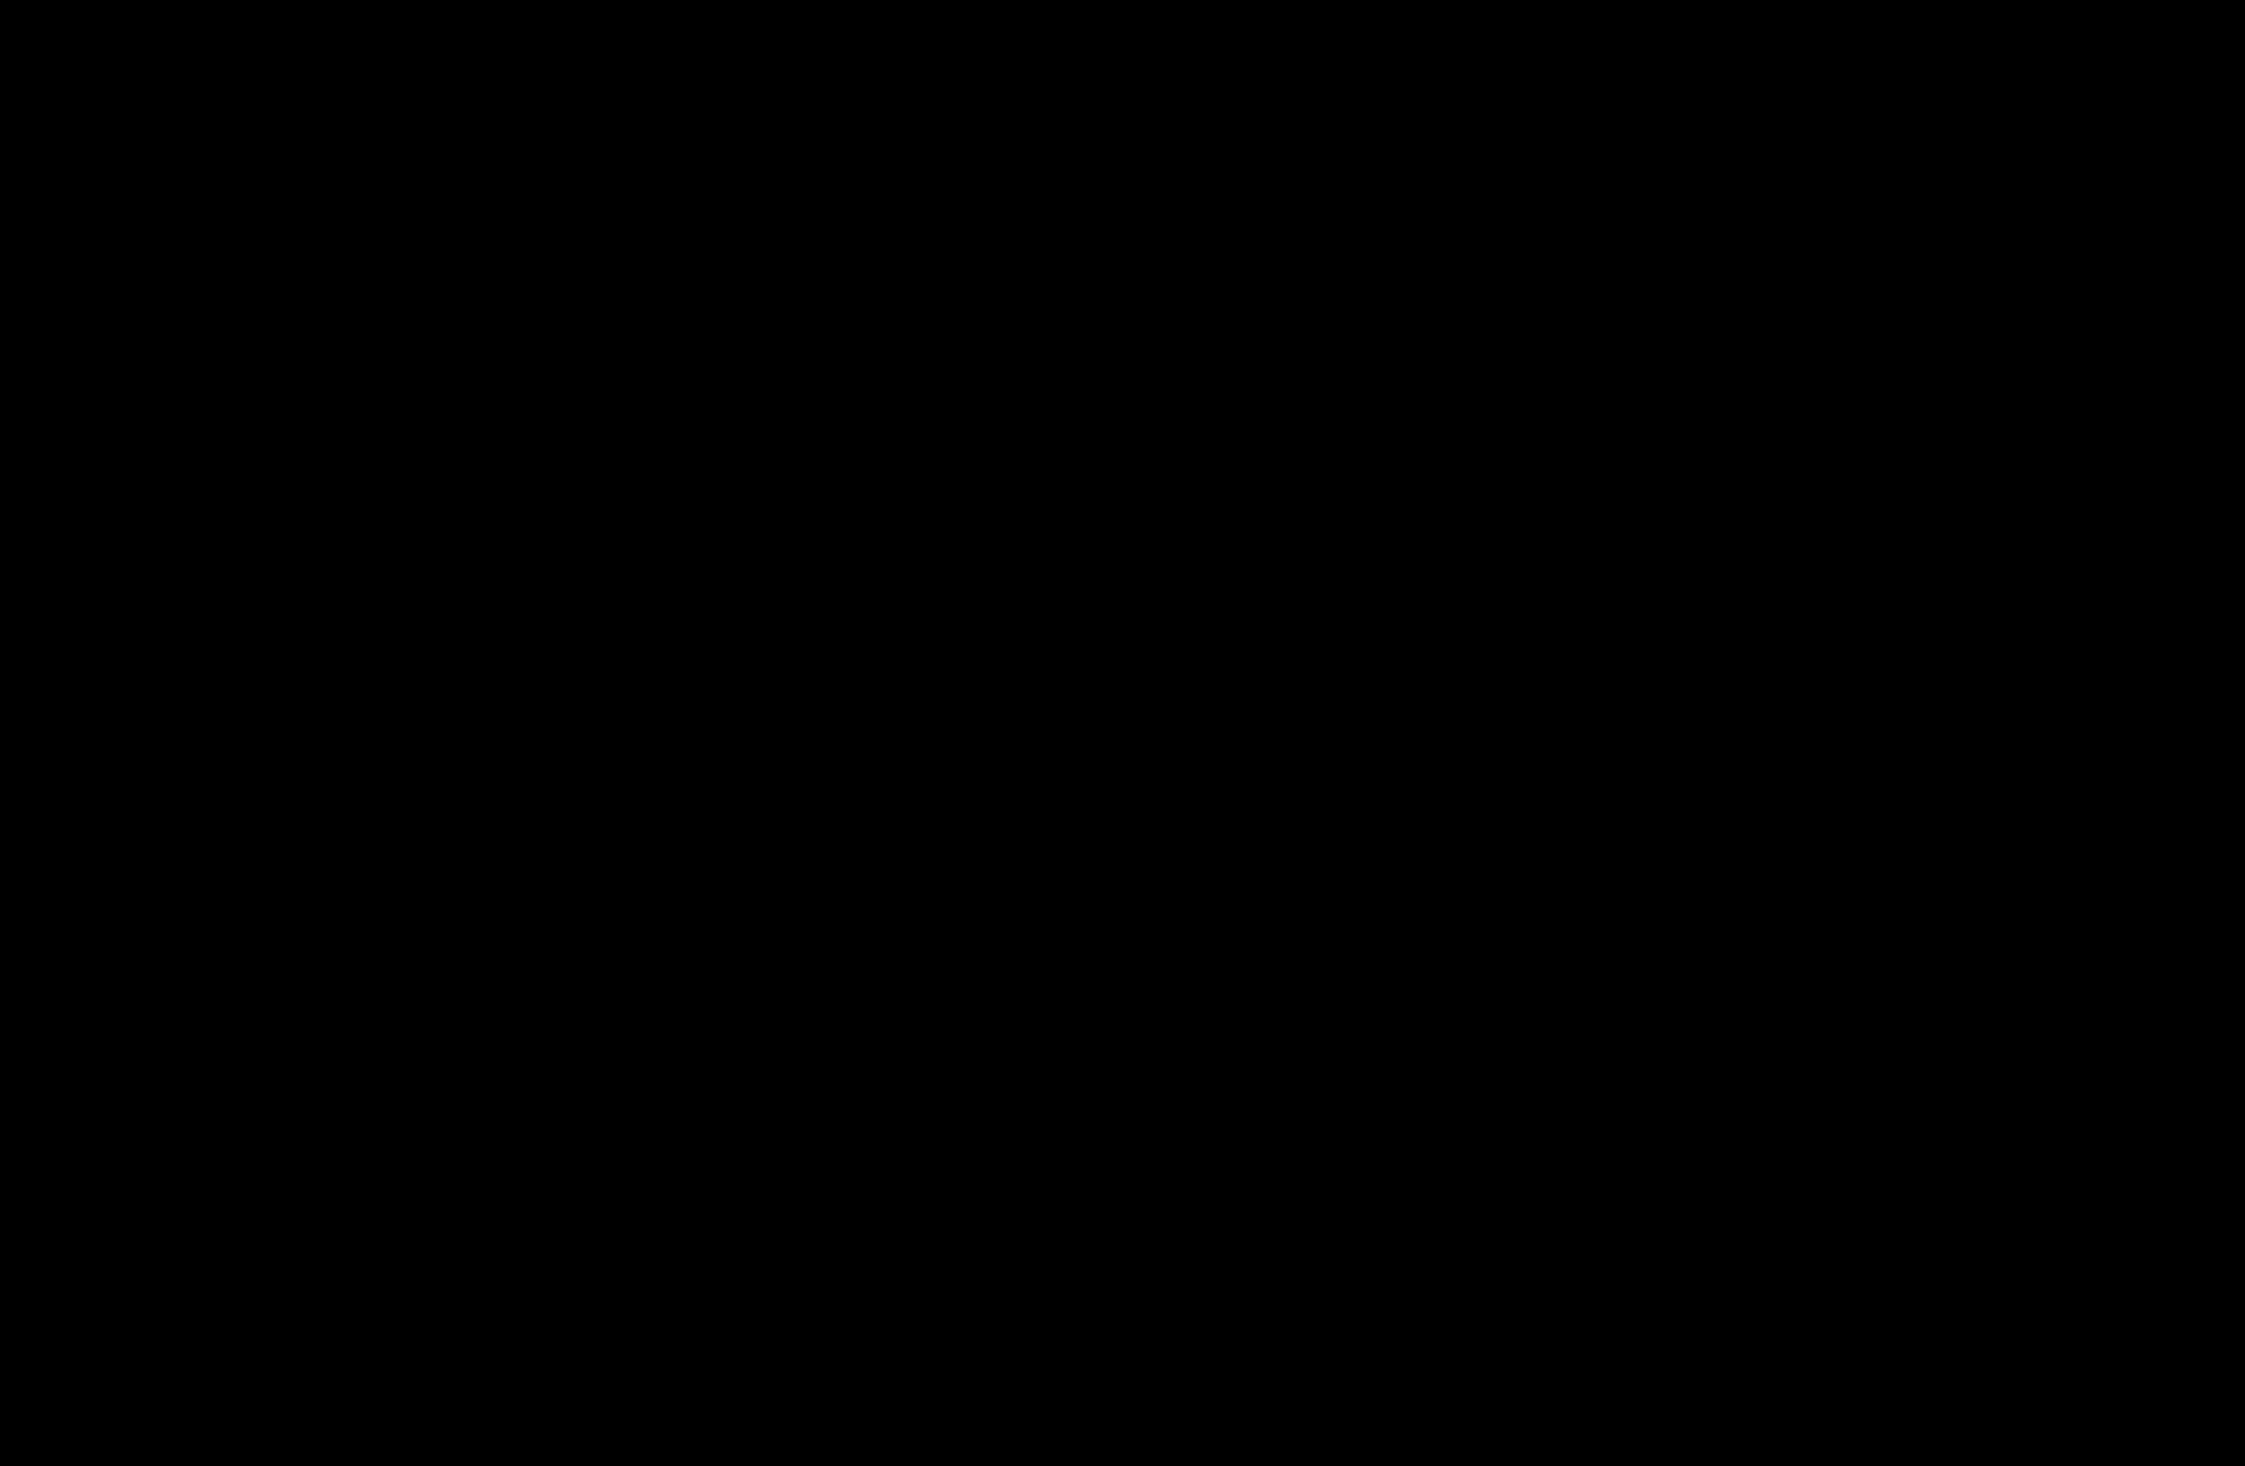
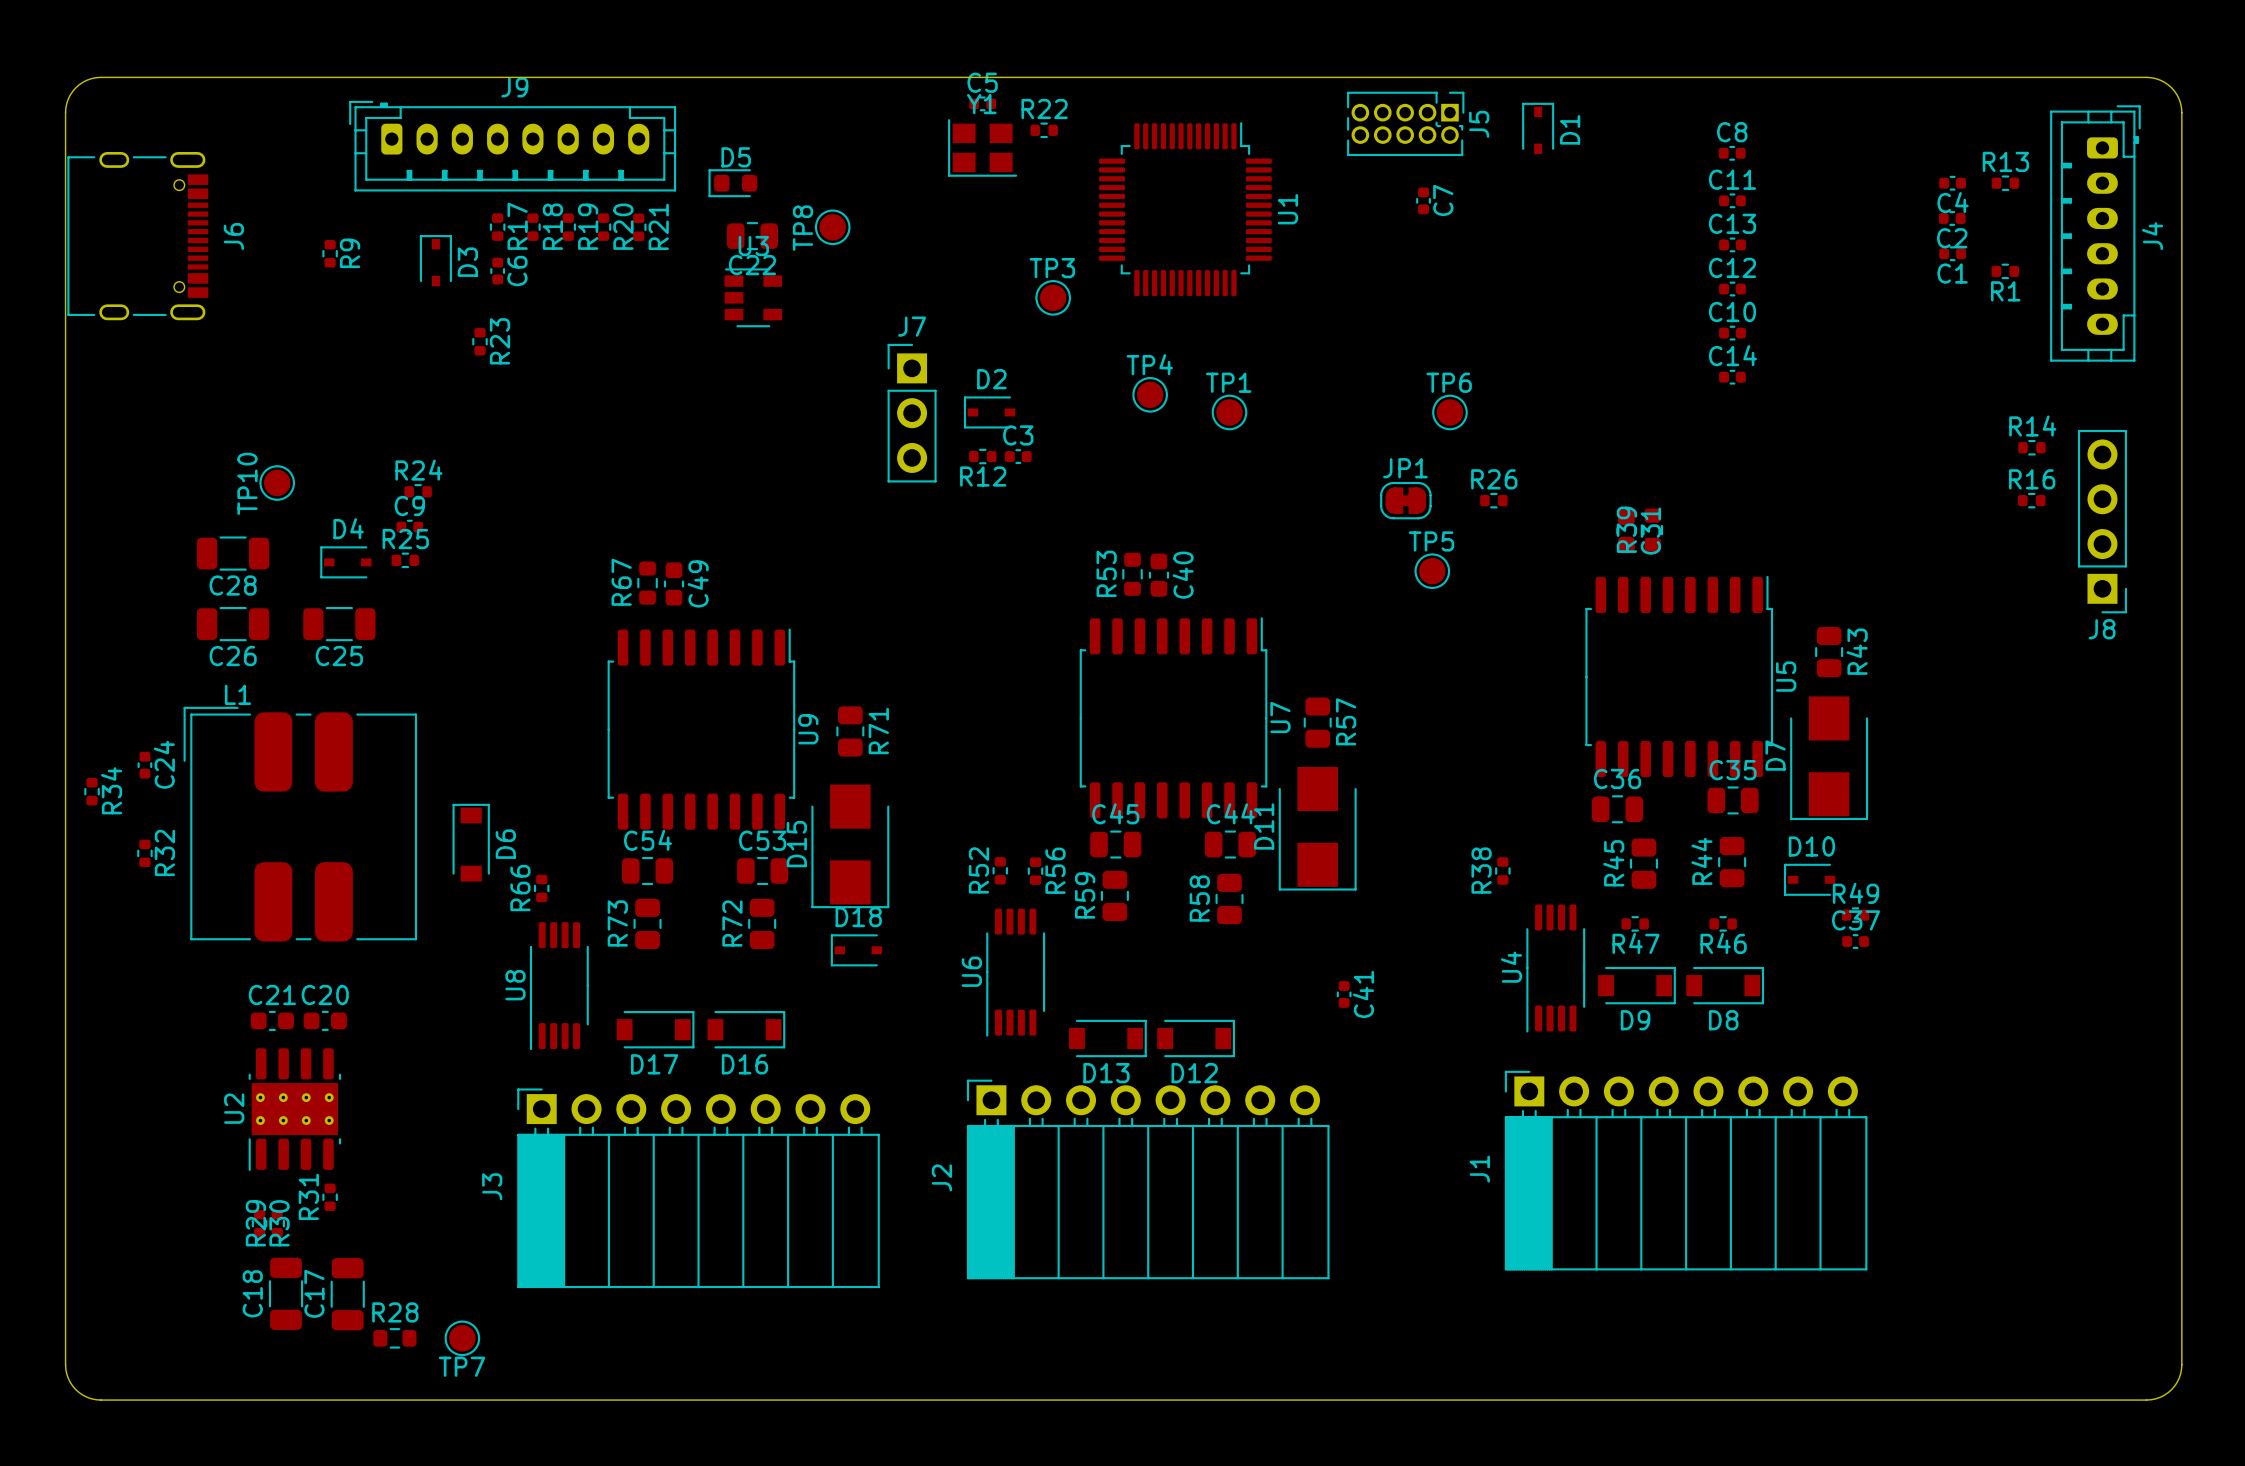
board edge: none -> (100, 77) (2146, 77) (2164, 82) (2177, 95) (2181, 112) (2181, 1364) (2177, 1382) (2164, 1395) (2146, 1400) (100, 1400) (83, 1395) (70, 1382) (65, 1364) (65, 112) (68, 99) (75, 87) (87, 80) (100, 77)
C5: none -> (982, 103)
J5: none -> (1405, 123)
D1: none -> (1538, 128)
R22: none -> (1044, 130)
J9: none -> (512, 146)
Y1: none -> (982, 147)
C8: none -> (1732, 153)
D5: none -> (732, 183)
C4: none -> (1952, 183)
R13: none -> (2005, 183)
C7: none -> (1423, 200)
C11: none -> (1732, 200)
U1: none -> (1185, 209)
C2: none -> (1952, 218)
R17: none -> (497, 227)
R18: none -> (532, 227)
R19: none -> (568, 227)
R20: none -> (603, 227)
R21: none -> (638, 227)
TP8: none -> (832, 227)
J4: none -> (2095, 233)
J6: none -> (137, 236)
C22: none -> (752, 236)
C13: none -> (1732, 244)
R9: none -> (330, 253)
C1: none -> (1952, 253)
D3: none -> (435, 260)
C6: none -> (497, 271)
R1: none -> (2005, 271)
C12: none -> (1732, 289)
U3: none -> (753, 297)
TP3: none -> (1053, 297)
C10: none -> (1732, 333)
R23: none -> (480, 341)
C14: none -> (1732, 377)
TP4: none -> (1150, 394)
D2: none -> (989, 412)
TP1: none -> (1229, 412)
TP6: none -> (1449, 412)
J7: none -> (912, 413)
R14: none -> (2031, 447)
R12: none -> (982, 456)
C3: none -> (1018, 456)
TP10: none -> (277, 483)
R24: none -> (418, 491)
JP1: none -> (1405, 500)
R26: none -> (1493, 500)
R16: none -> (2031, 500)
J8: none -> (2102, 521)
C9: none -> (409, 527)
R39: none -> (1652, 530)
C31: none -> (1626, 531)
C28: none -> (233, 553)
R25: none -> (405, 560)
D4: none -> (345, 562)
TP5: none -> (1432, 571)
R53: none -> (1132, 574)
C40: none -> (1158, 575)
R67: none -> (647, 583)
C49: none -> (674, 583)
C26: none -> (233, 624)
C25: none -> (339, 624)
R43: none -> (1829, 652)
U5: none -> (1679, 676)
U7: none -> (1173, 717)
R57: none -> (1317, 722)
U9: none -> (701, 729)
R71: none -> (850, 731)
D7: none -> (1829, 758)
C24: none -> (144, 765)
R34: none -> (92, 791)
C35: none -> (1733, 800)
C36: none -> (1617, 809)
L1: none -> (300, 824)
D11: none -> (1317, 828)
D6: none -> (471, 842)
C45: none -> (1115, 844)
C44: none -> (1230, 844)
D15: none -> (850, 846)
R32: none -> (144, 853)
R44: none -> (1732, 862)
R45: none -> (1643, 863)
C54: none -> (647, 870)
C53: none -> (762, 870)
R52: none -> (1000, 870)
R38: none -> (1502, 870)
R56: none -> (1035, 871)
D10: none -> (1809, 879)
R66: none -> (541, 888)
R59: none -> (1114, 895)
R58: none -> (1229, 898)
R49: none -> (1855, 915)
R73: none -> (647, 923)
R72: none -> (762, 923)
R47: none -> (1635, 923)
R46: none -> (1723, 923)
C37: none -> (1855, 941)
D18: none -> (856, 950)
U4: none -> (1555, 968)
U6: none -> (1015, 972)
D9: none -> (1636, 985)
D8: none -> (1725, 985)
U8: none -> (559, 986)
C41: none -> (1344, 994)
C21: none -> (272, 1020)
C20: none -> (325, 1020)
D17: none -> (655, 1029)
D16: none -> (746, 1029)
D13: none -> (1107, 1038)
D12: none -> (1196, 1038)
U2: none -> (294, 1109)
J1: none -> (1686, 1170)
J2: none -> (1148, 1179)
J3: none -> (698, 1188)
R31: none -> (330, 1197)
R30: none -> (259, 1223)
R29: none -> (277, 1223)
C18: none -> (286, 1293)
C17: none -> (347, 1294)
R28: none -> (394, 1338)
TP7: none -> (462, 1338)

